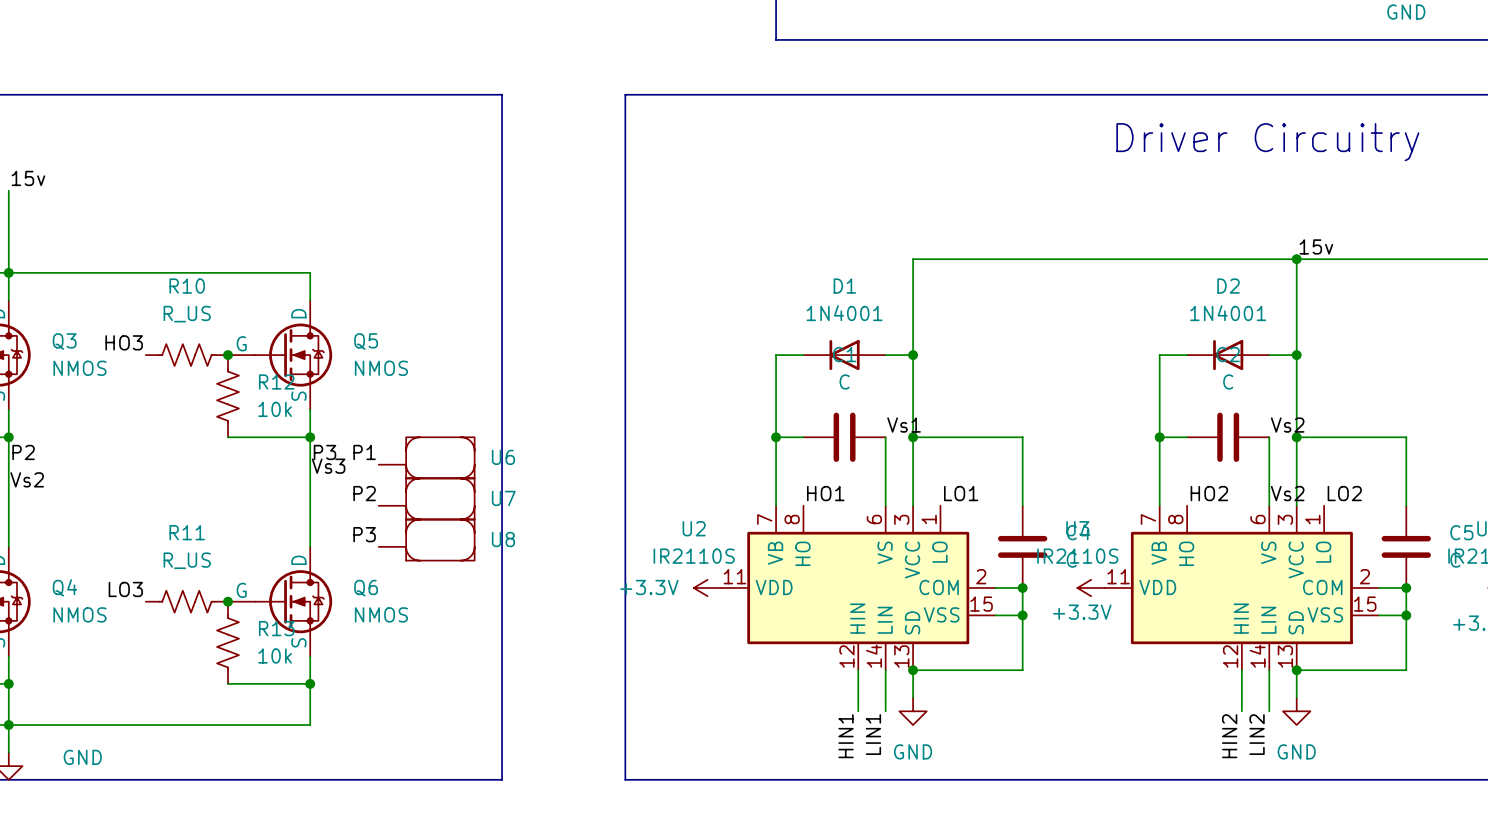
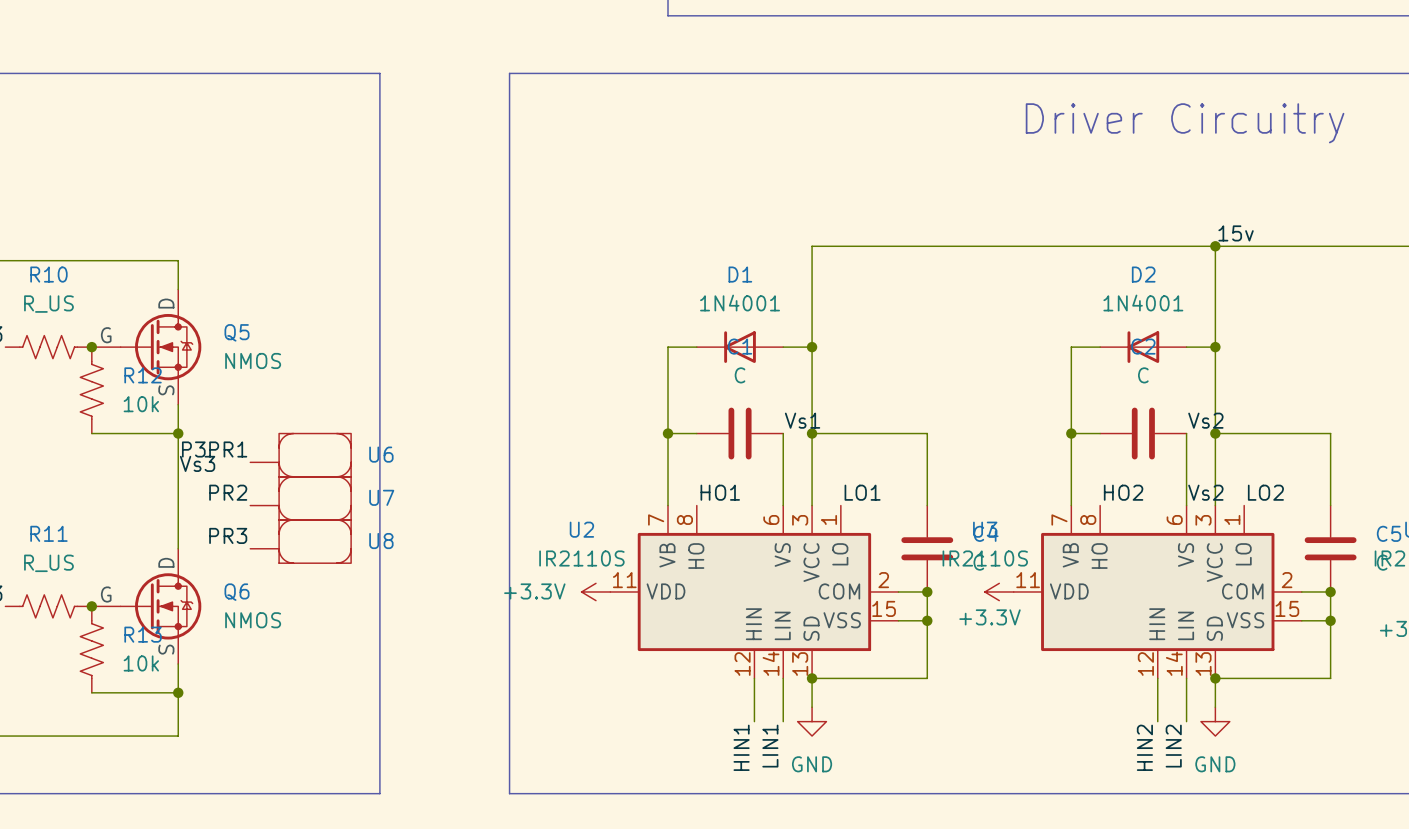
label: P1 (364, 452) -> PR1 (228, 449)
label: P2 (364, 493) -> PR2 (228, 492)
label: P3 (364, 534) -> PR3 (228, 535)

